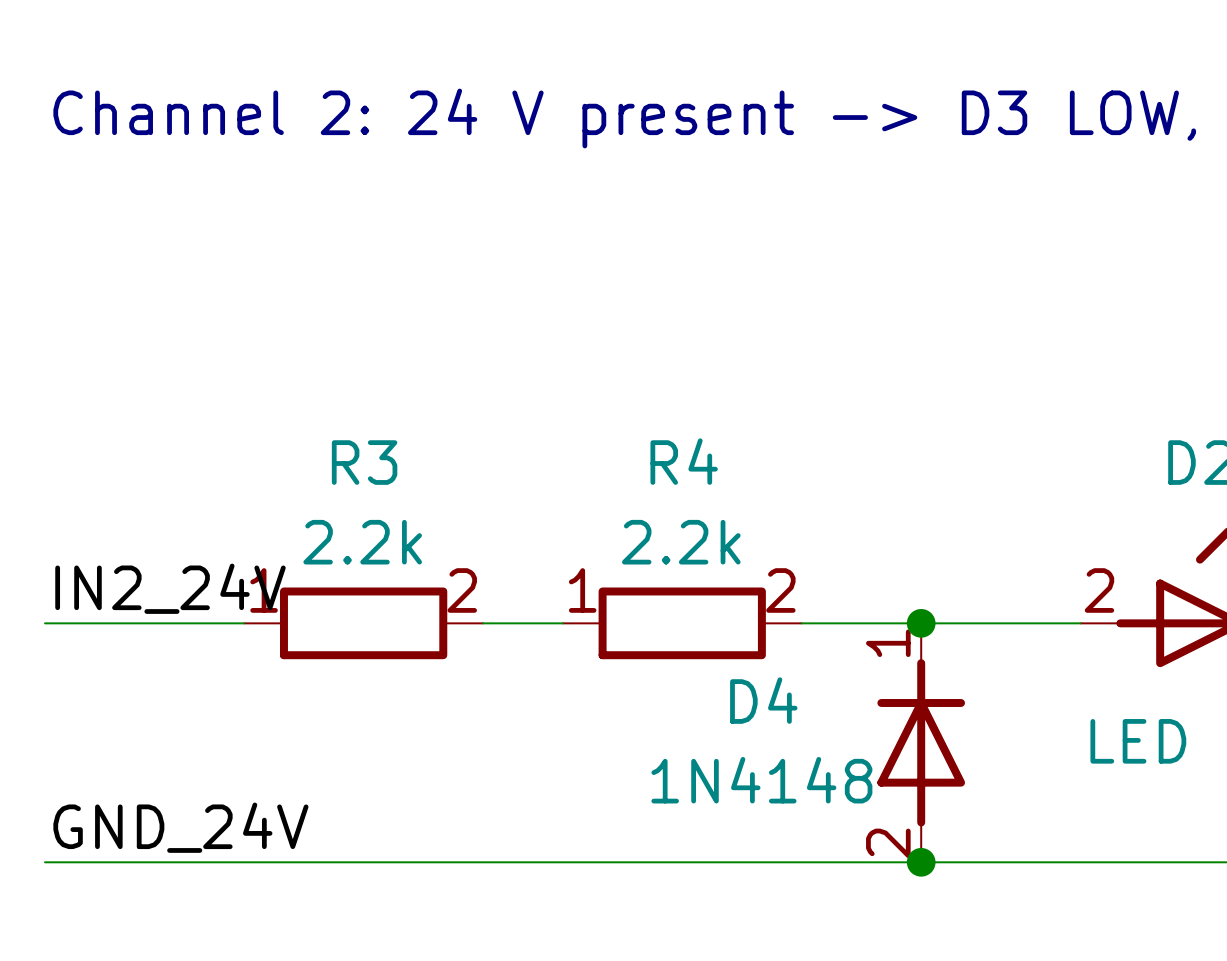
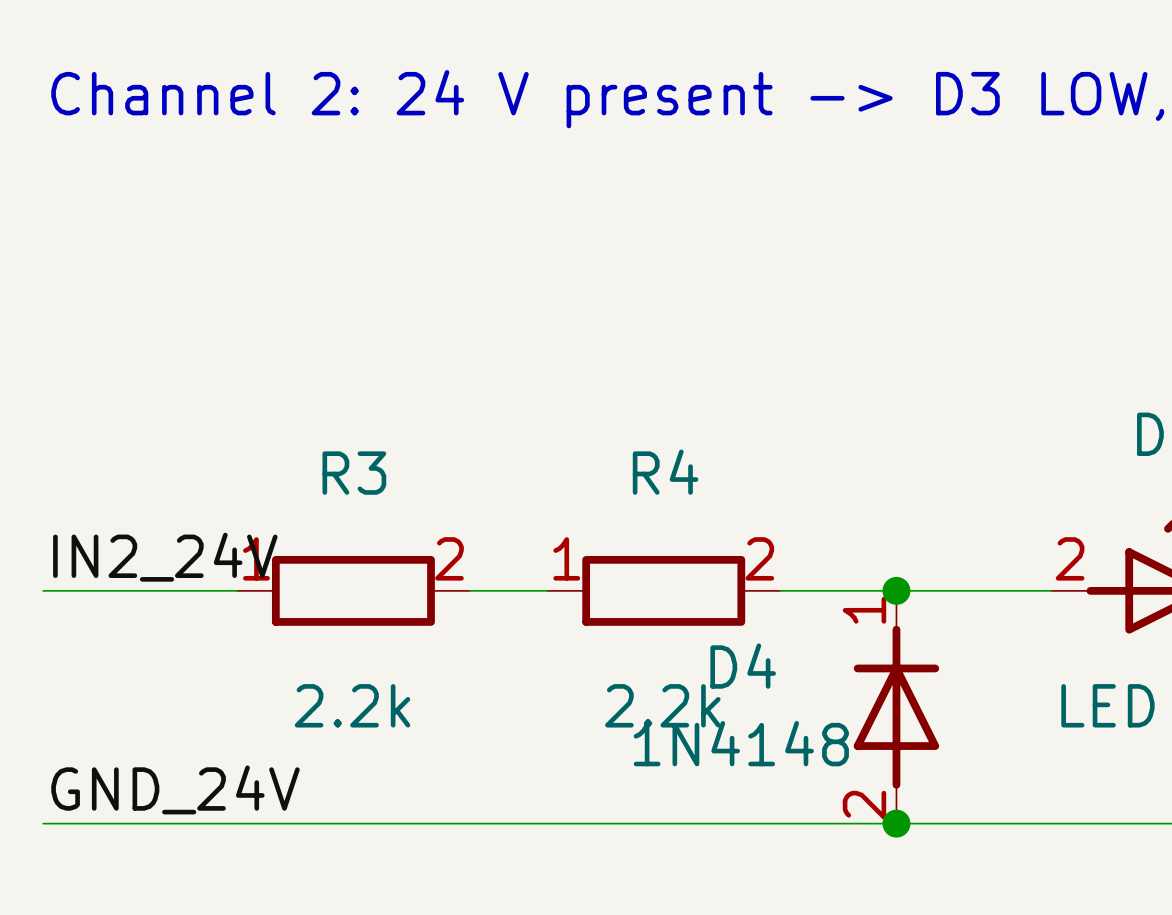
R4 name position: R4 (684, 461) -> R4 (665, 472)
R3 name position: R3 (364, 462) -> R3 (354, 473)
R3 value position: 2.2k (362, 542) -> 2.2k (352, 705)
R4 value position: 2.2k (681, 542) -> 2.2k (662, 705)

